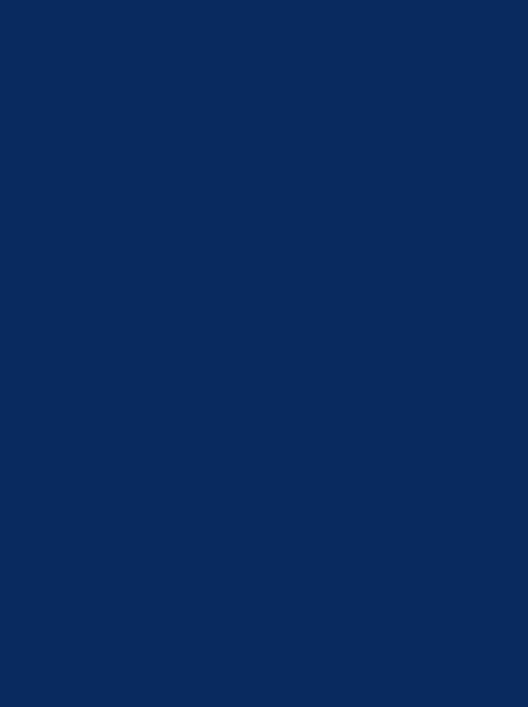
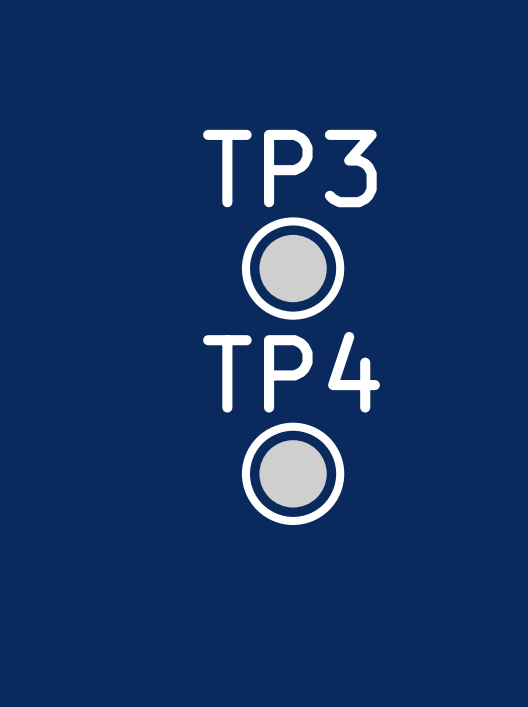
TP3: none -> (293, 268)
TP4: none -> (293, 473)

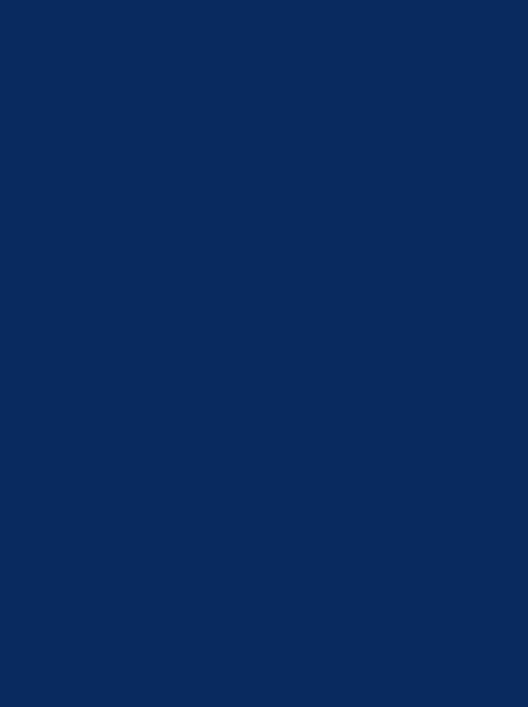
TP3: (293, 268) -> none
TP4: (293, 473) -> none

